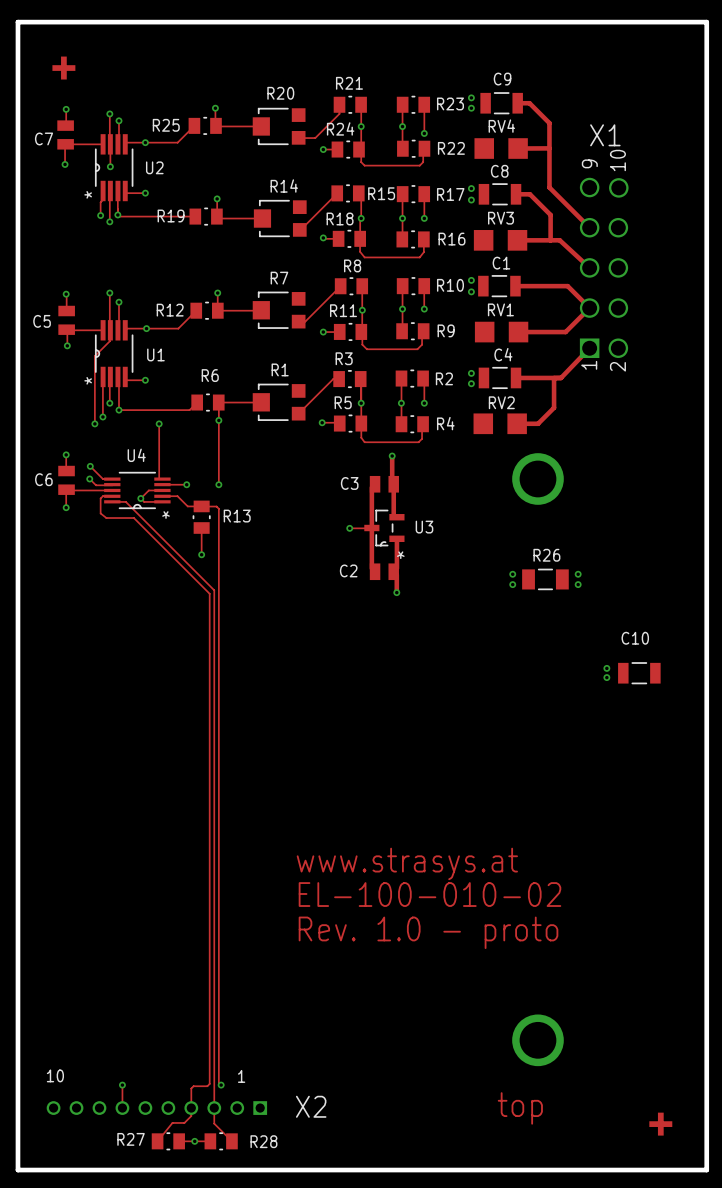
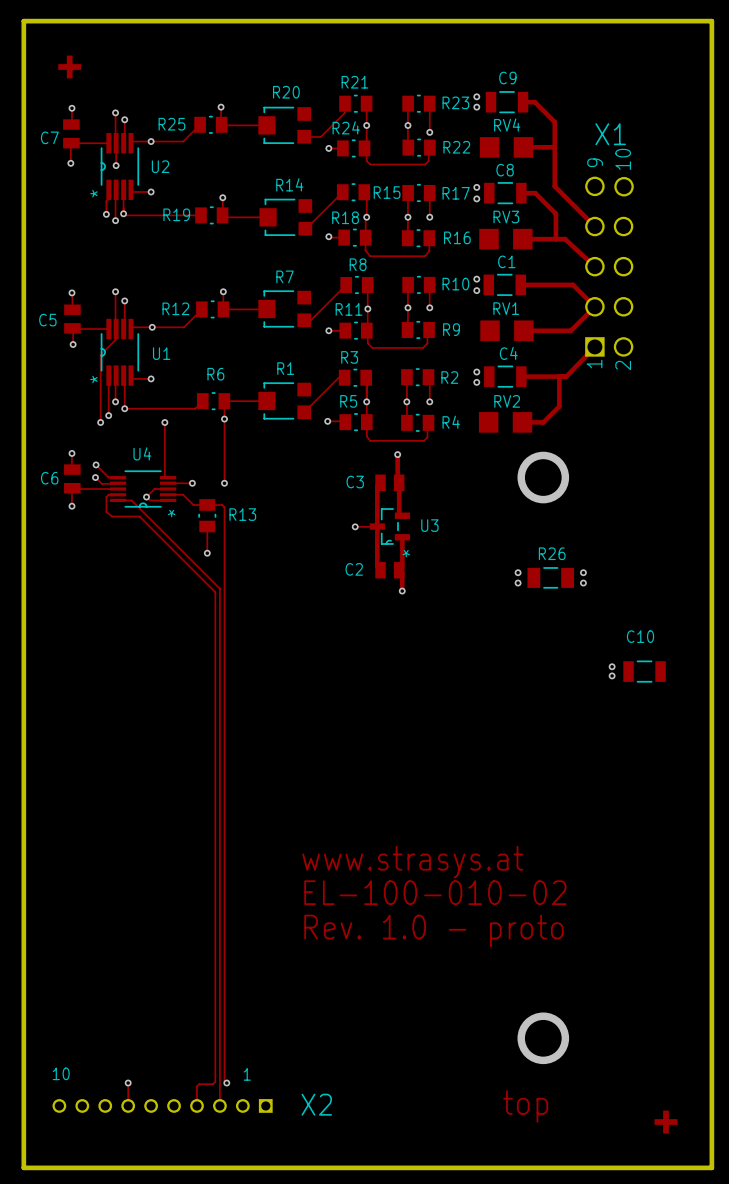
track: (191, 1108) (191, 1116) (184, 1122) (172, 1122) (157, 1141) -> none
track: (214, 1108) (214, 1123) (231, 1141) -> none
track: (210, 1140) (179, 1141) -> none
R27: (168, 1141) -> none
via: (194, 1141) -> none
R28: (221, 1141) -> none

